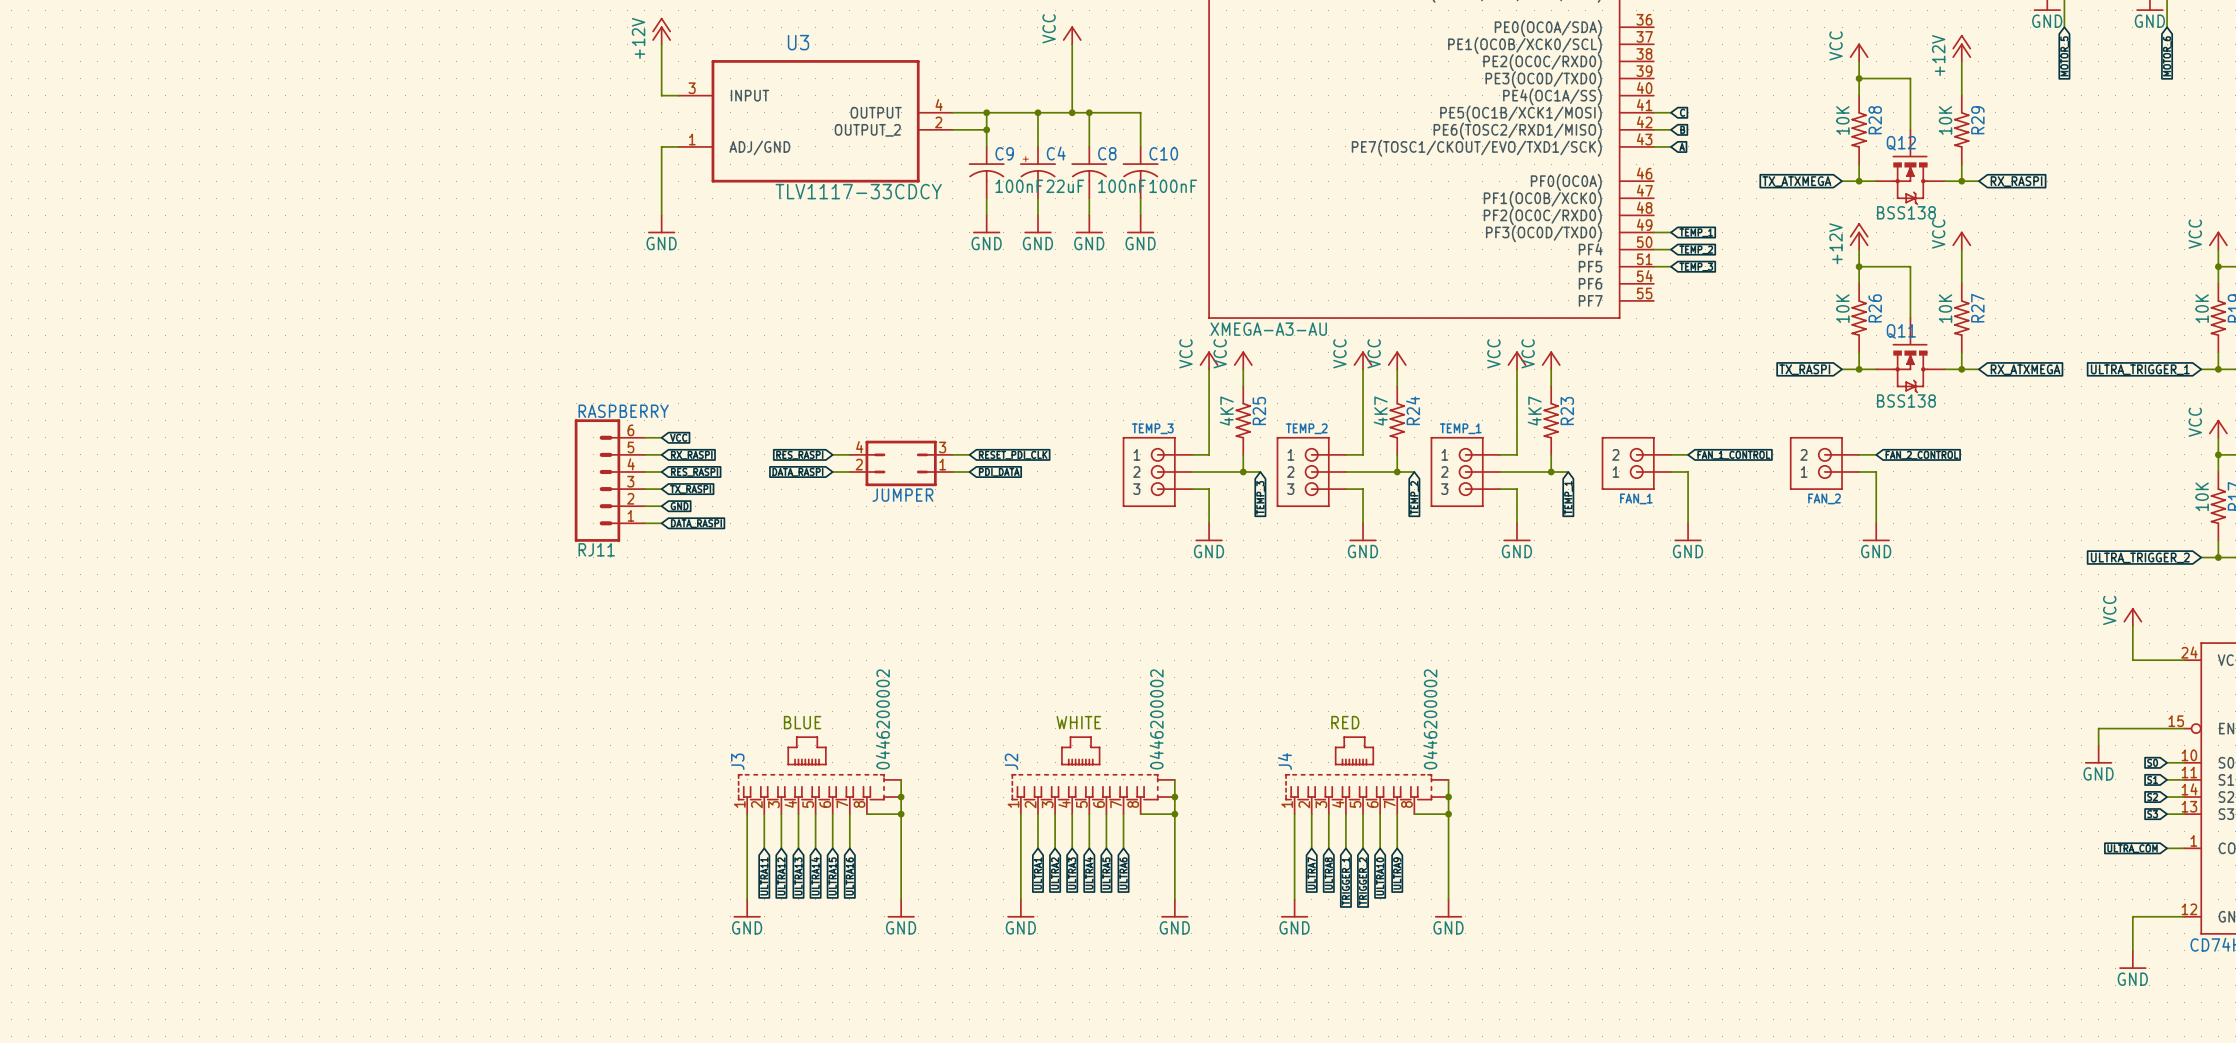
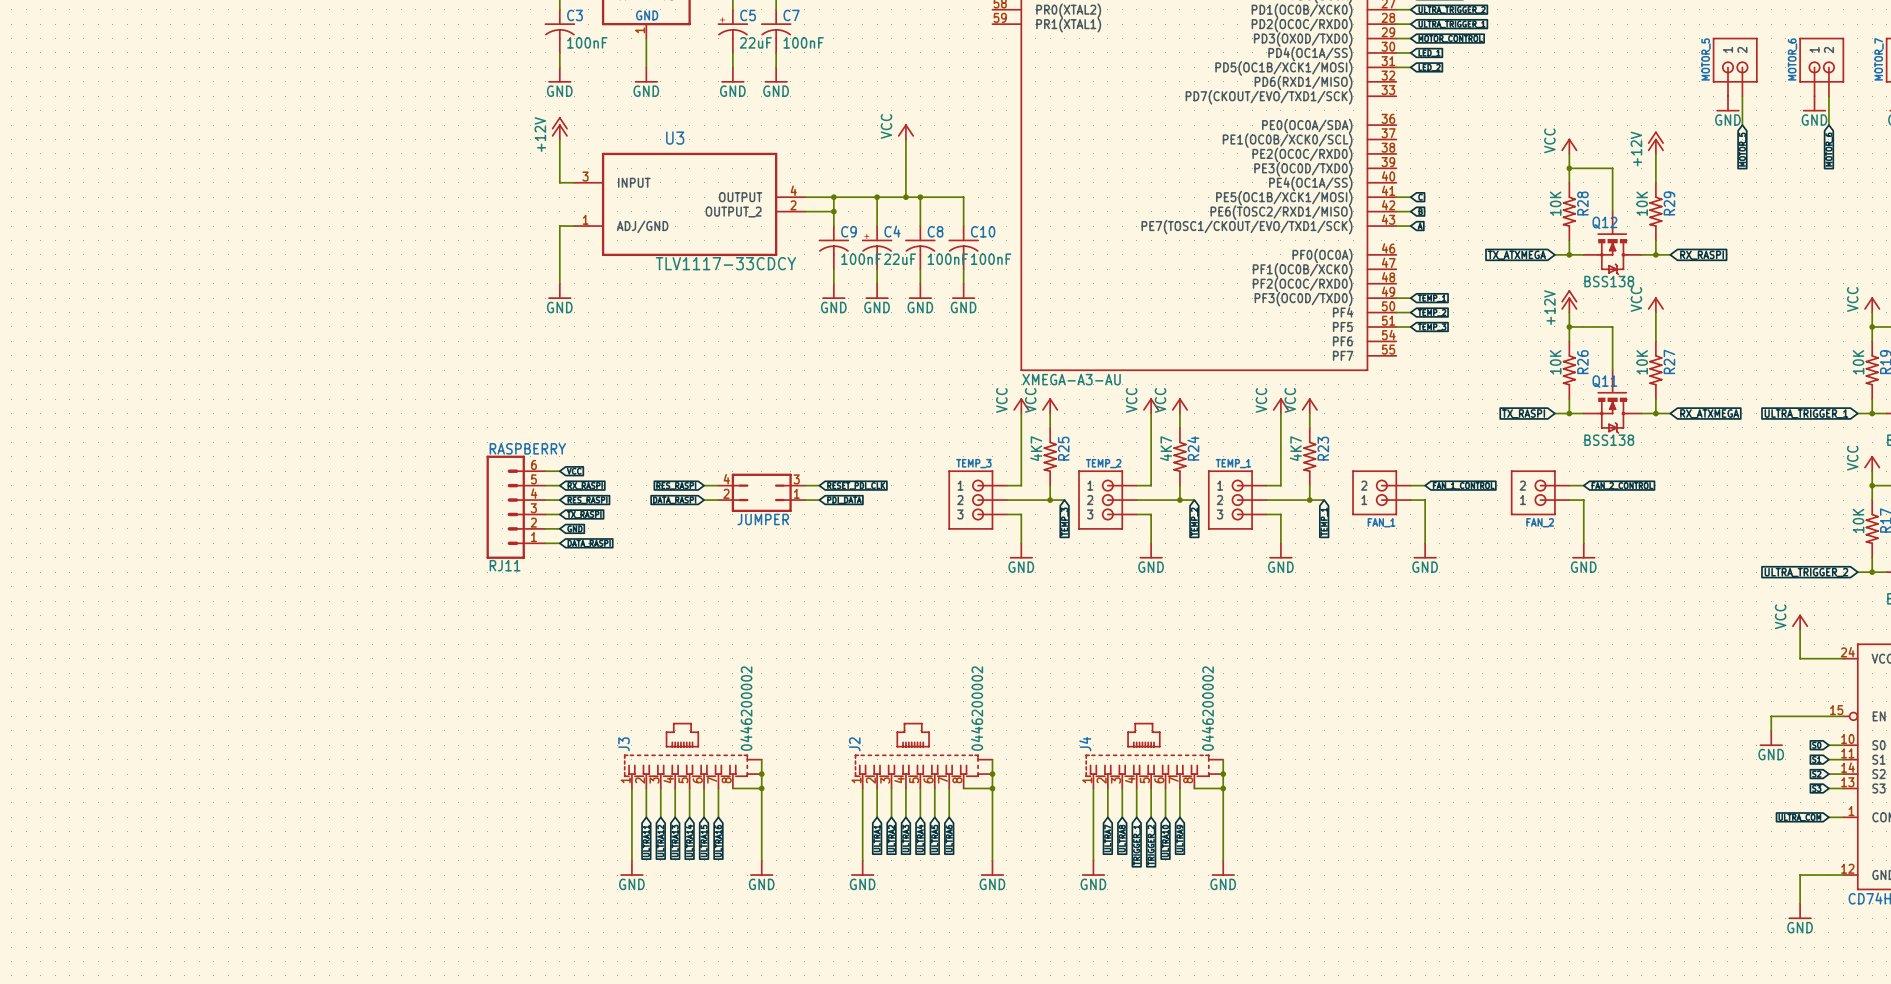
text: BLUE (802, 722) -> none
text: WHITE (1078, 722) -> none
text: RED (1345, 722) -> none

